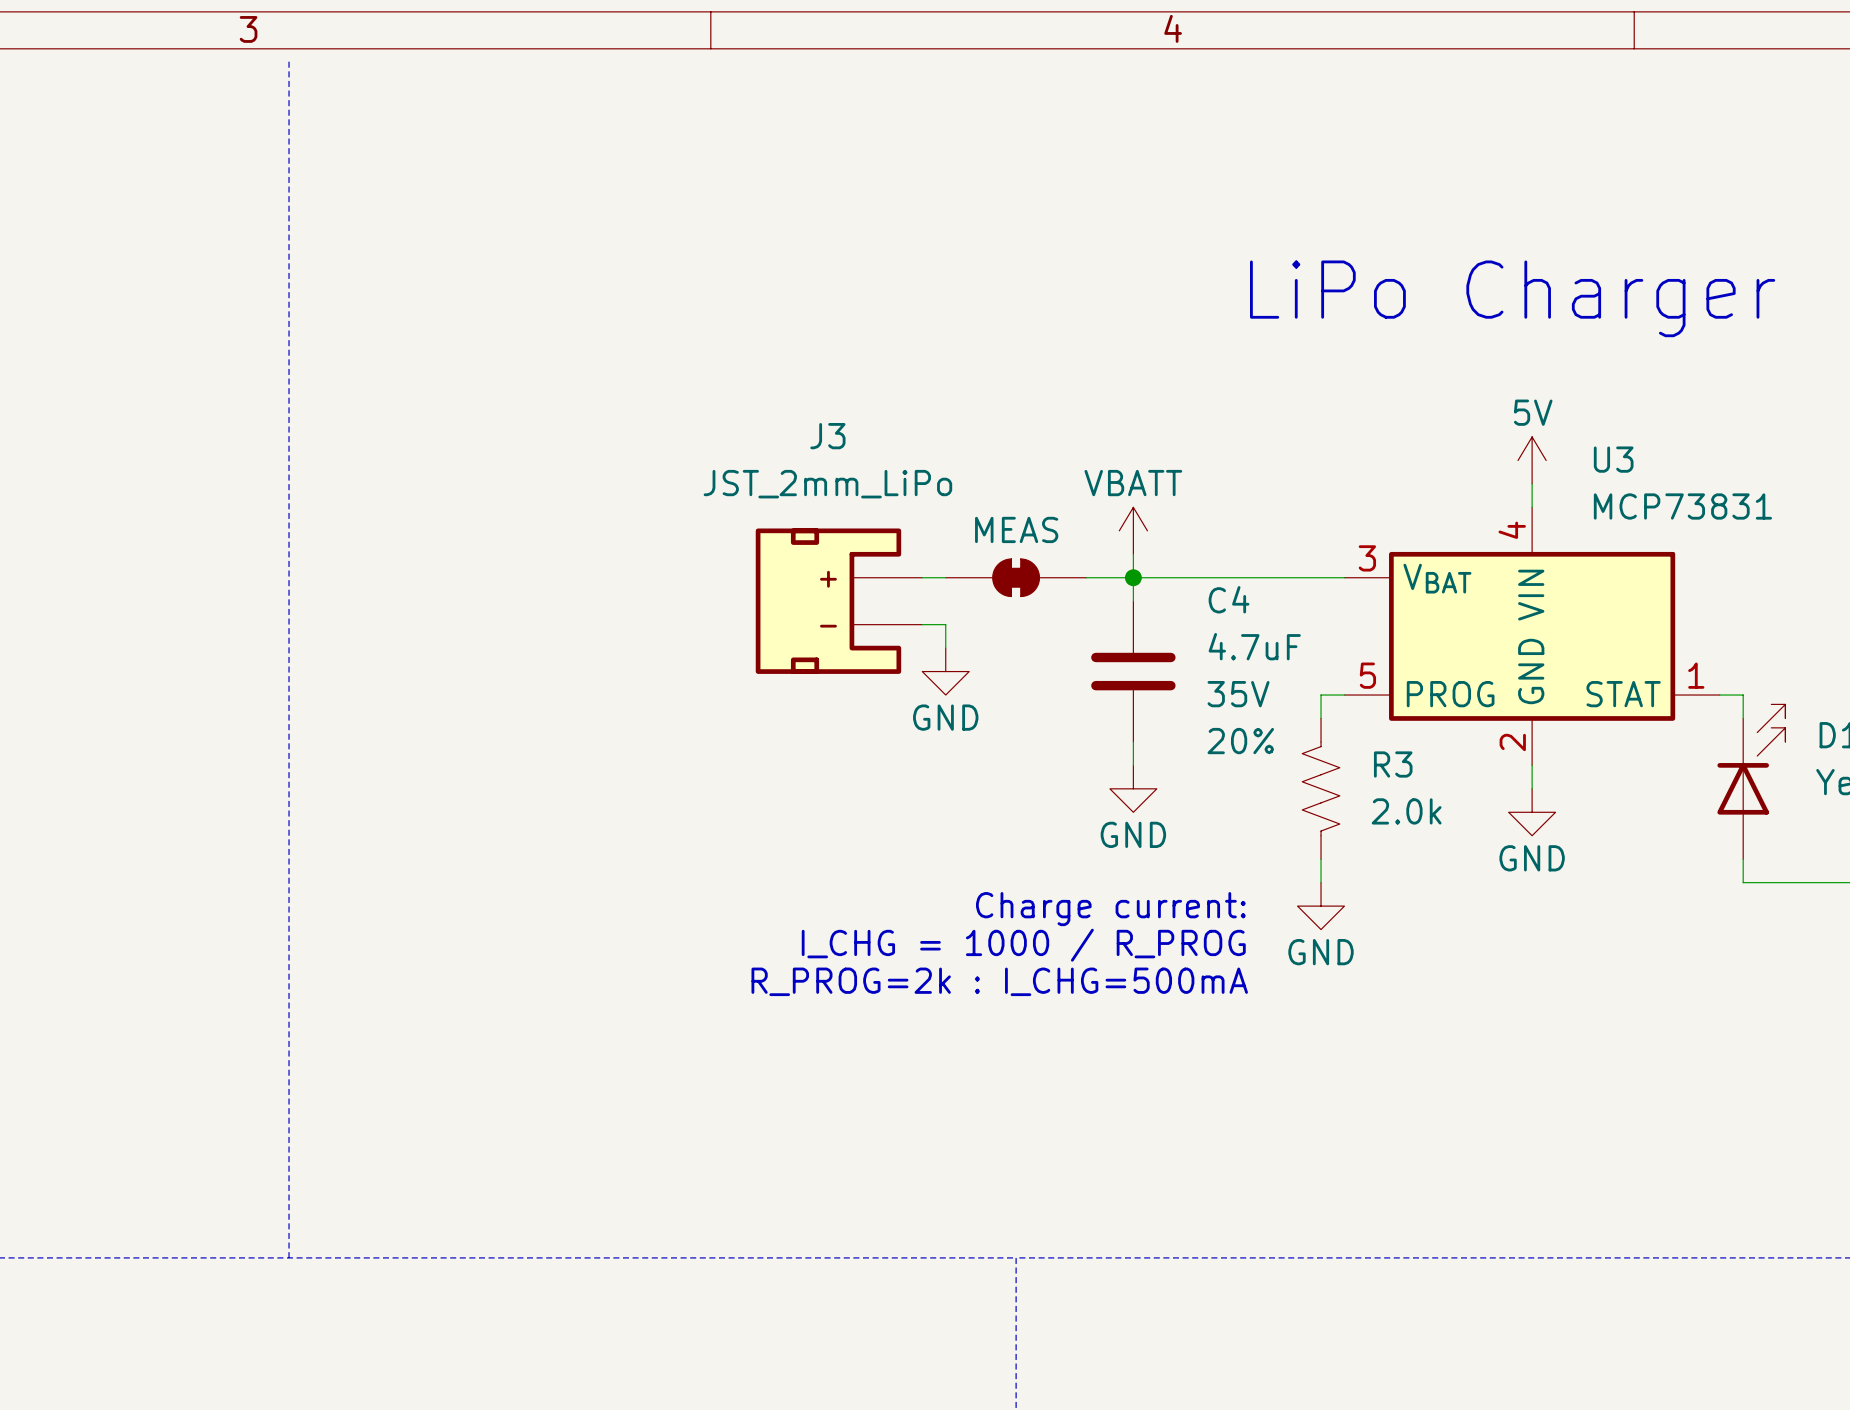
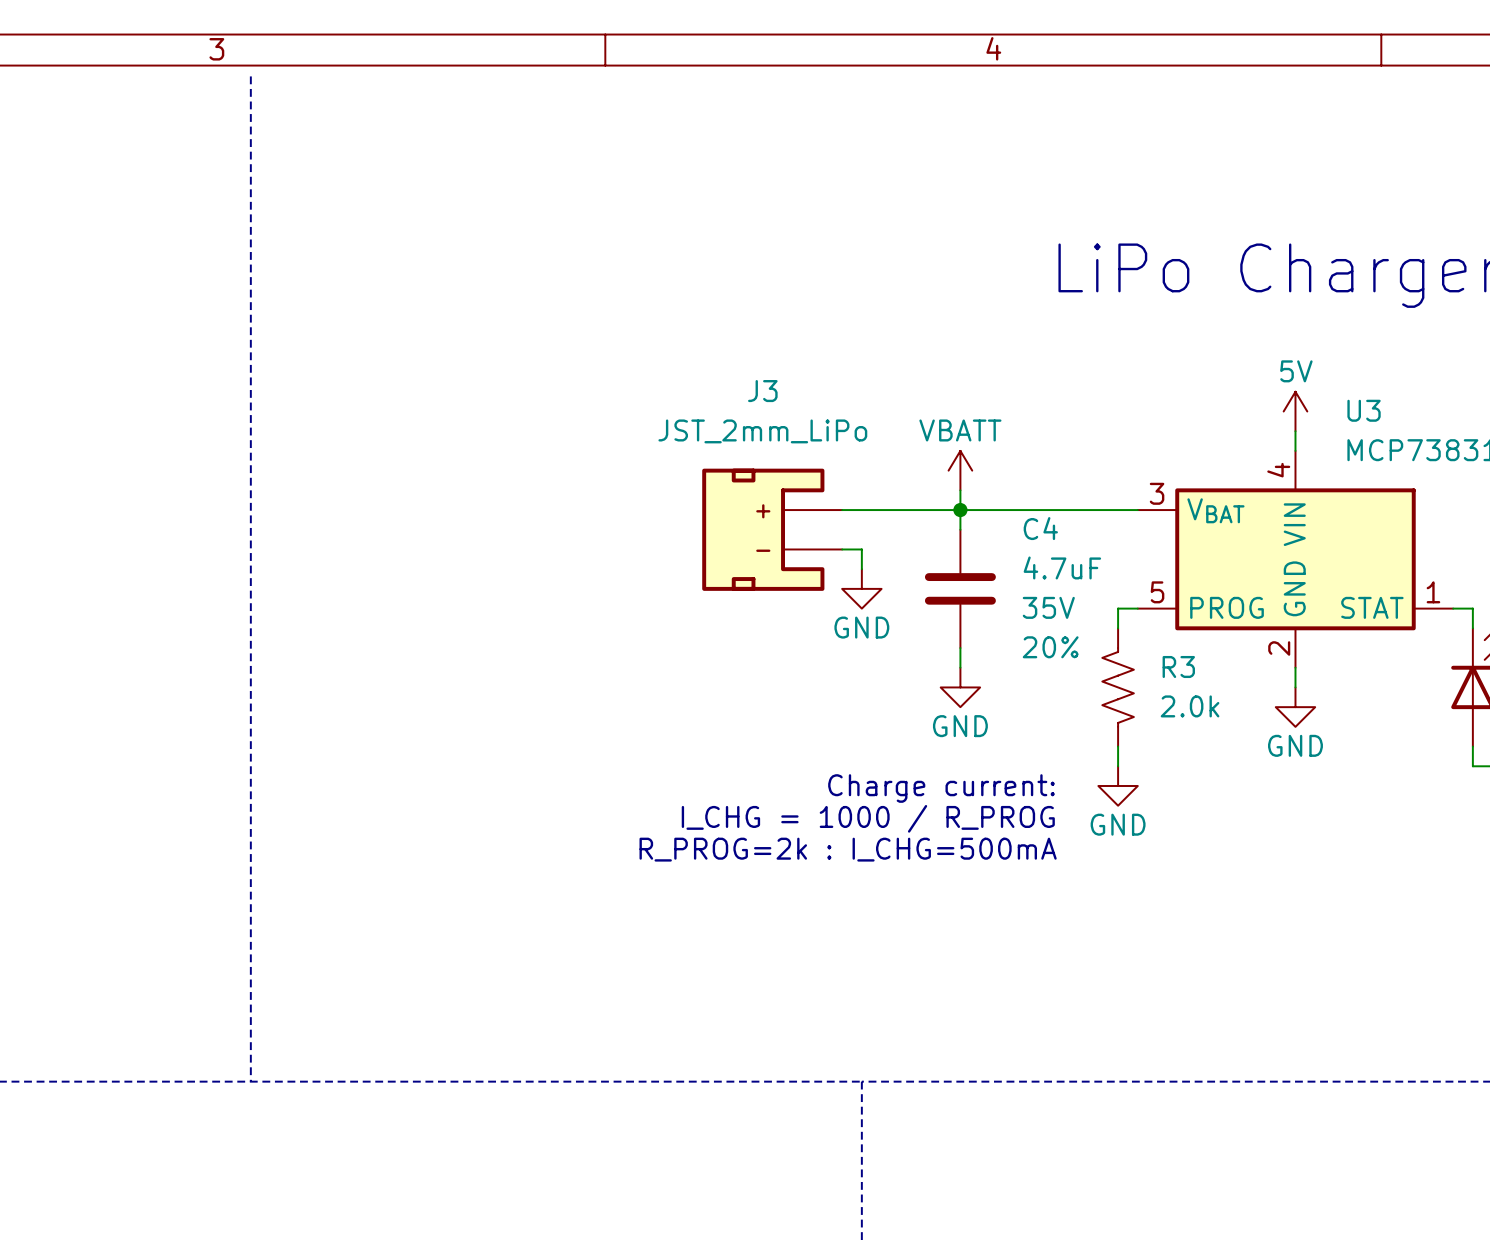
part: MEAS (1016, 577) -> none
J3 position: (839, 601) -> (772, 529)
wire: (922, 624) (945, 624) (945, 648) -> (842, 549) (861, 549) (861, 569)
power symbol position: GND (945, 671) -> GND (861, 588)

